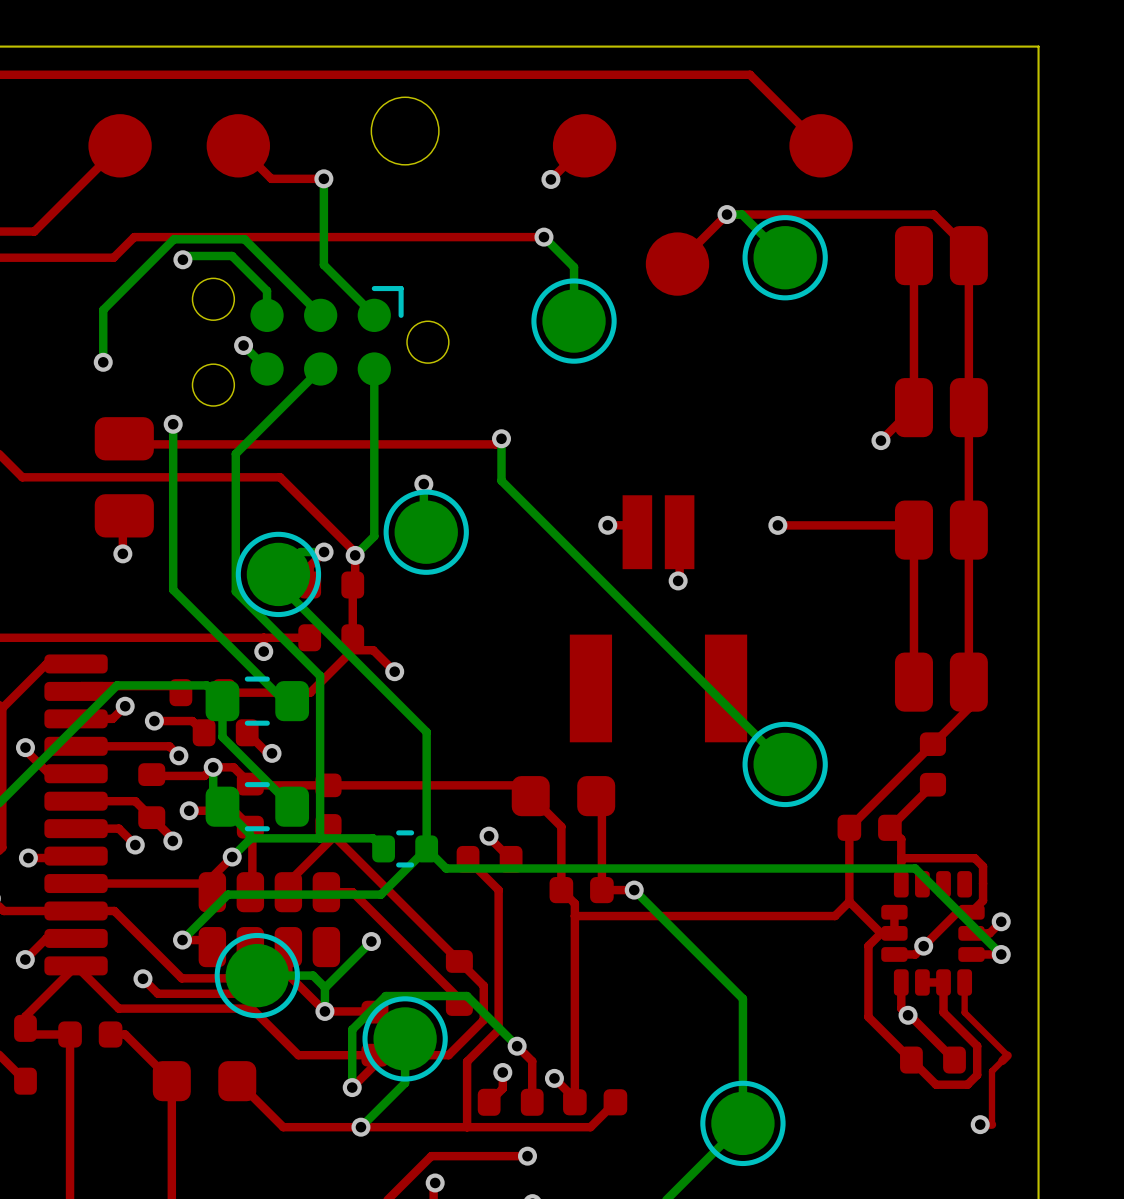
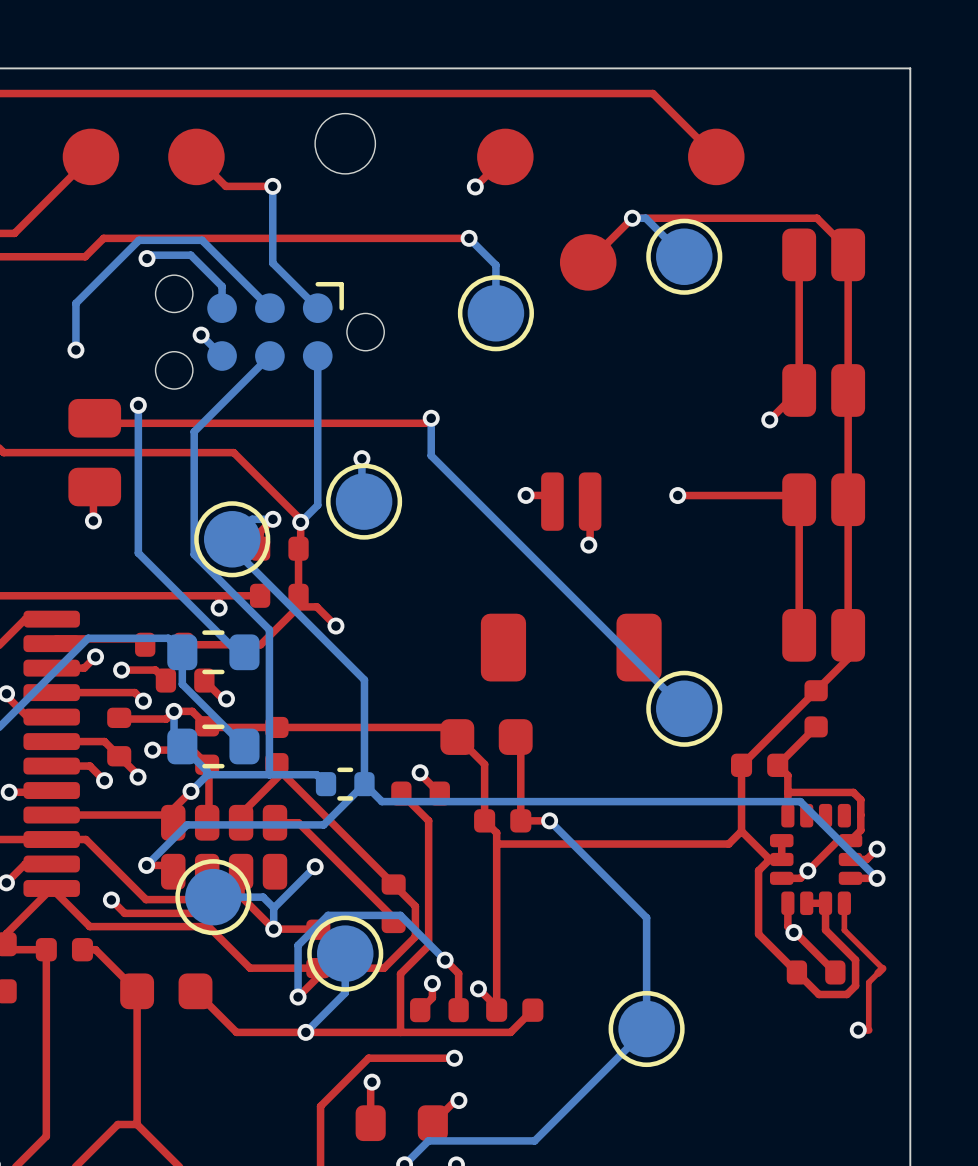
part footprint: [569, 495, 748, 743] -> [480, 472, 662, 682]

